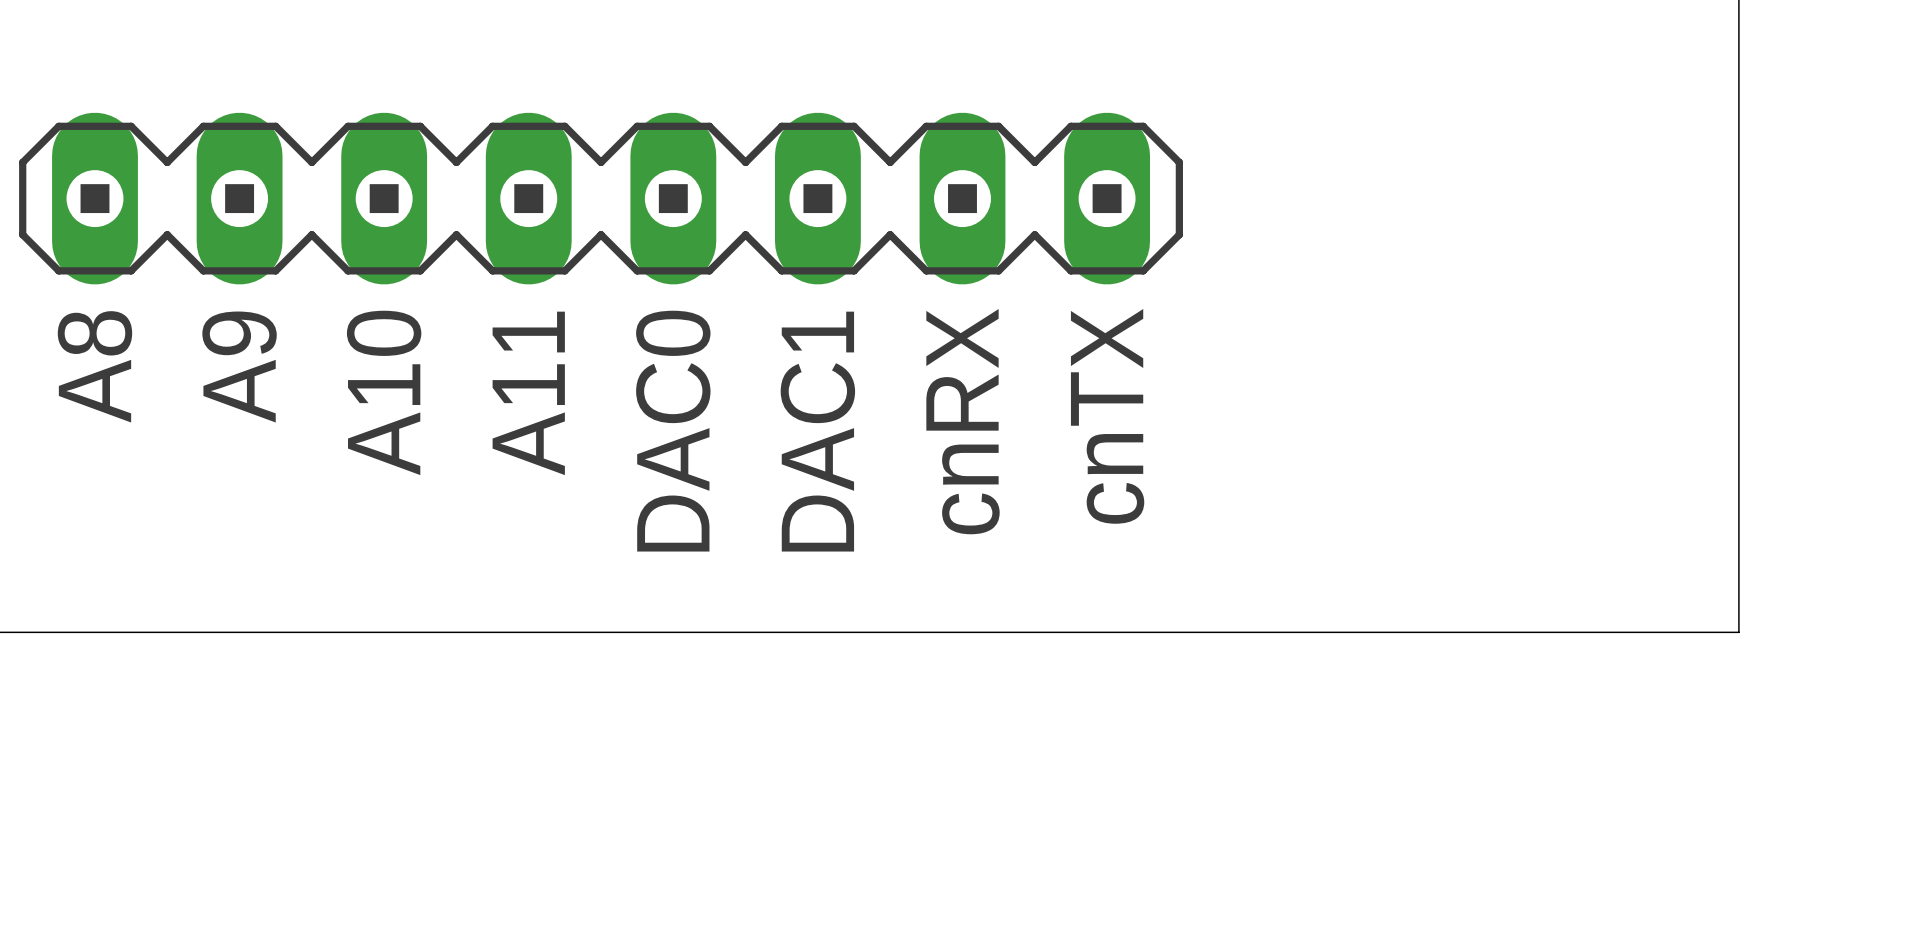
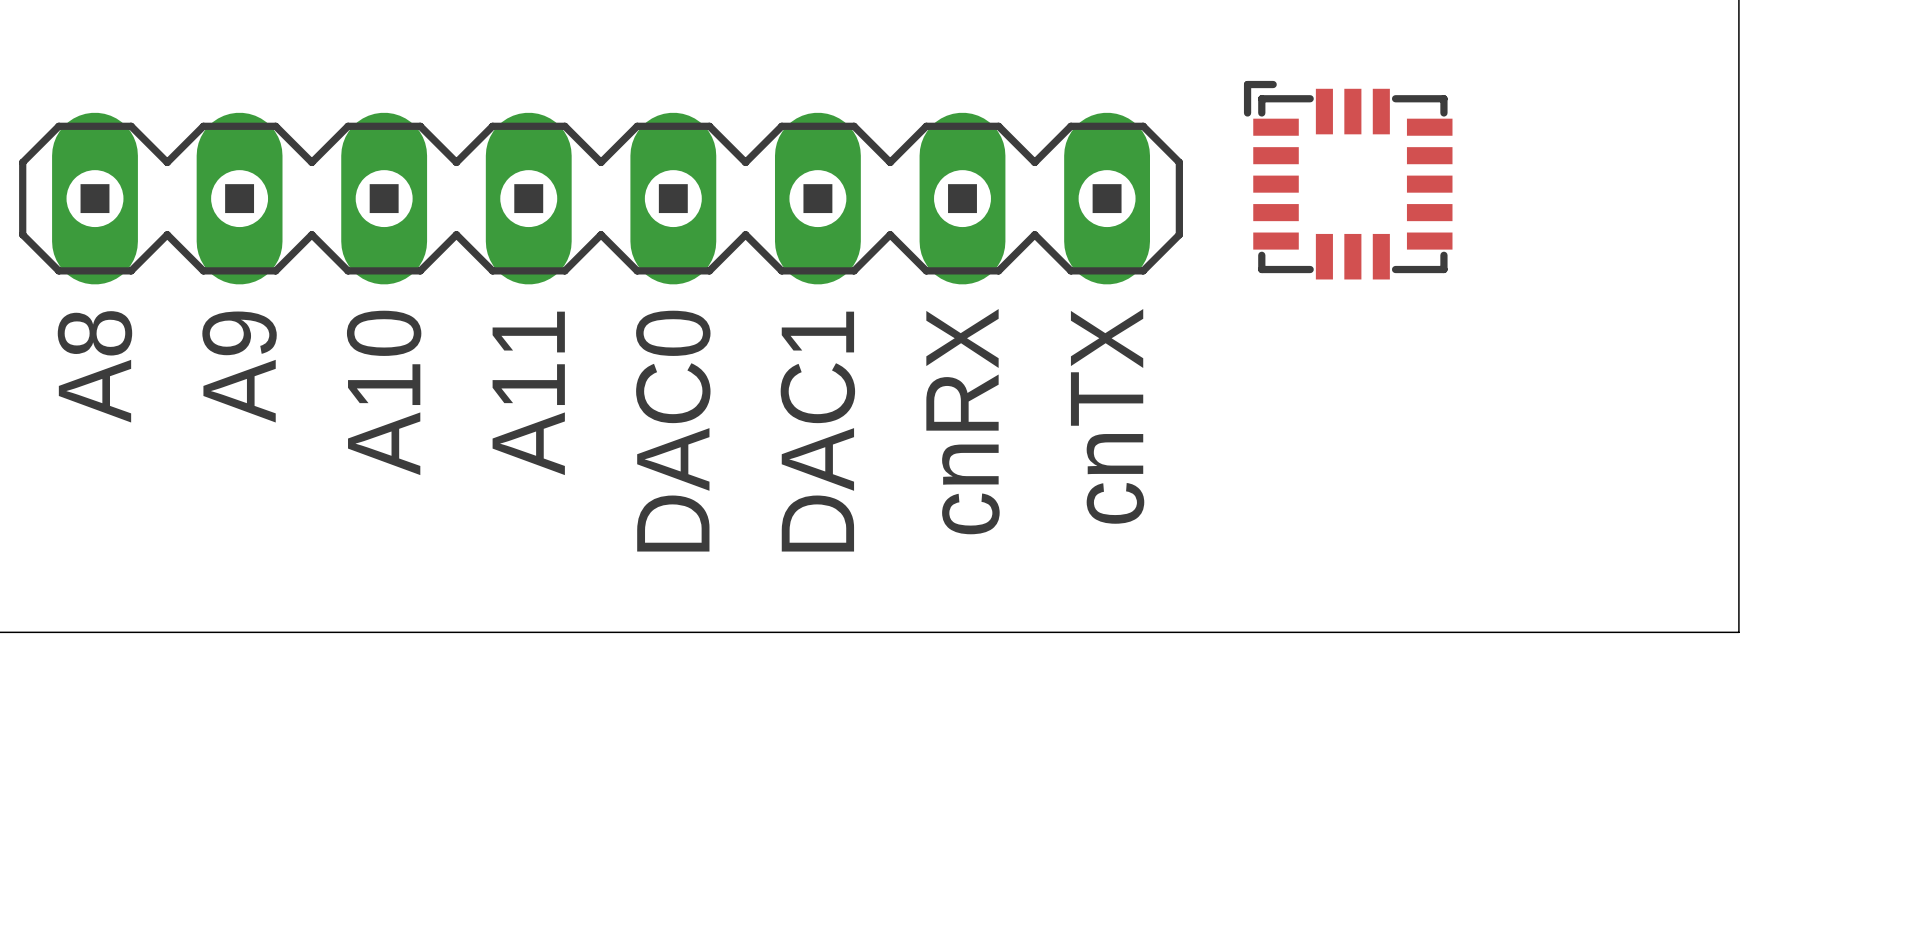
part: none -> (1348, 180)

